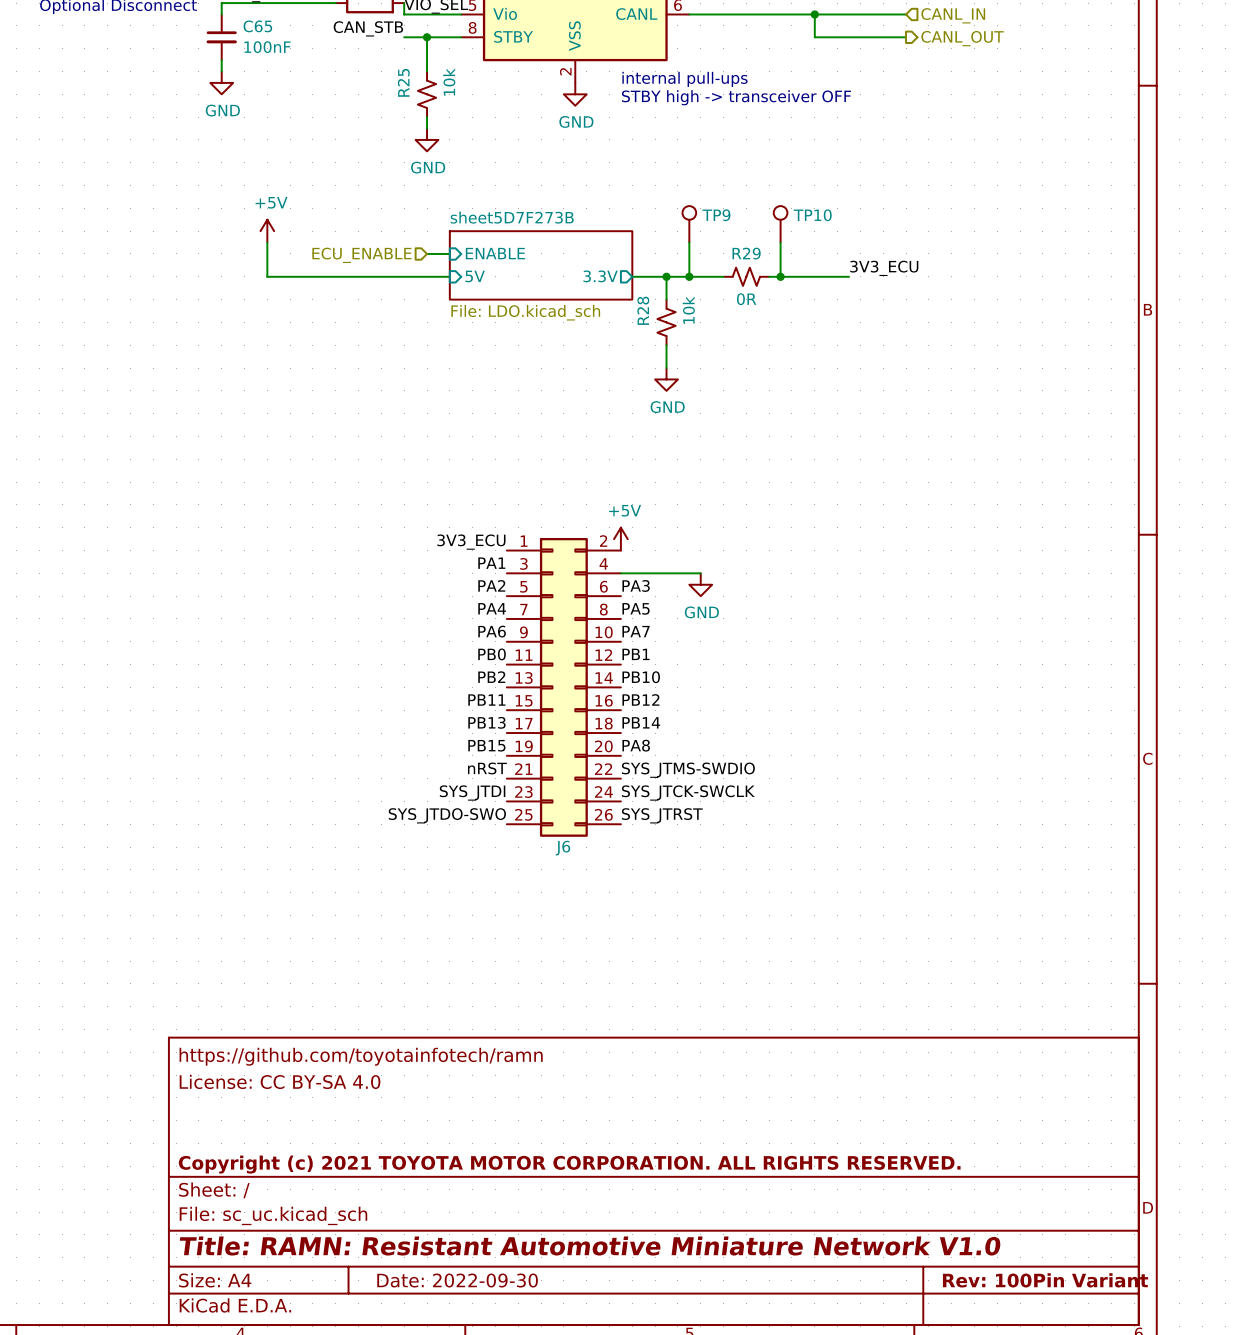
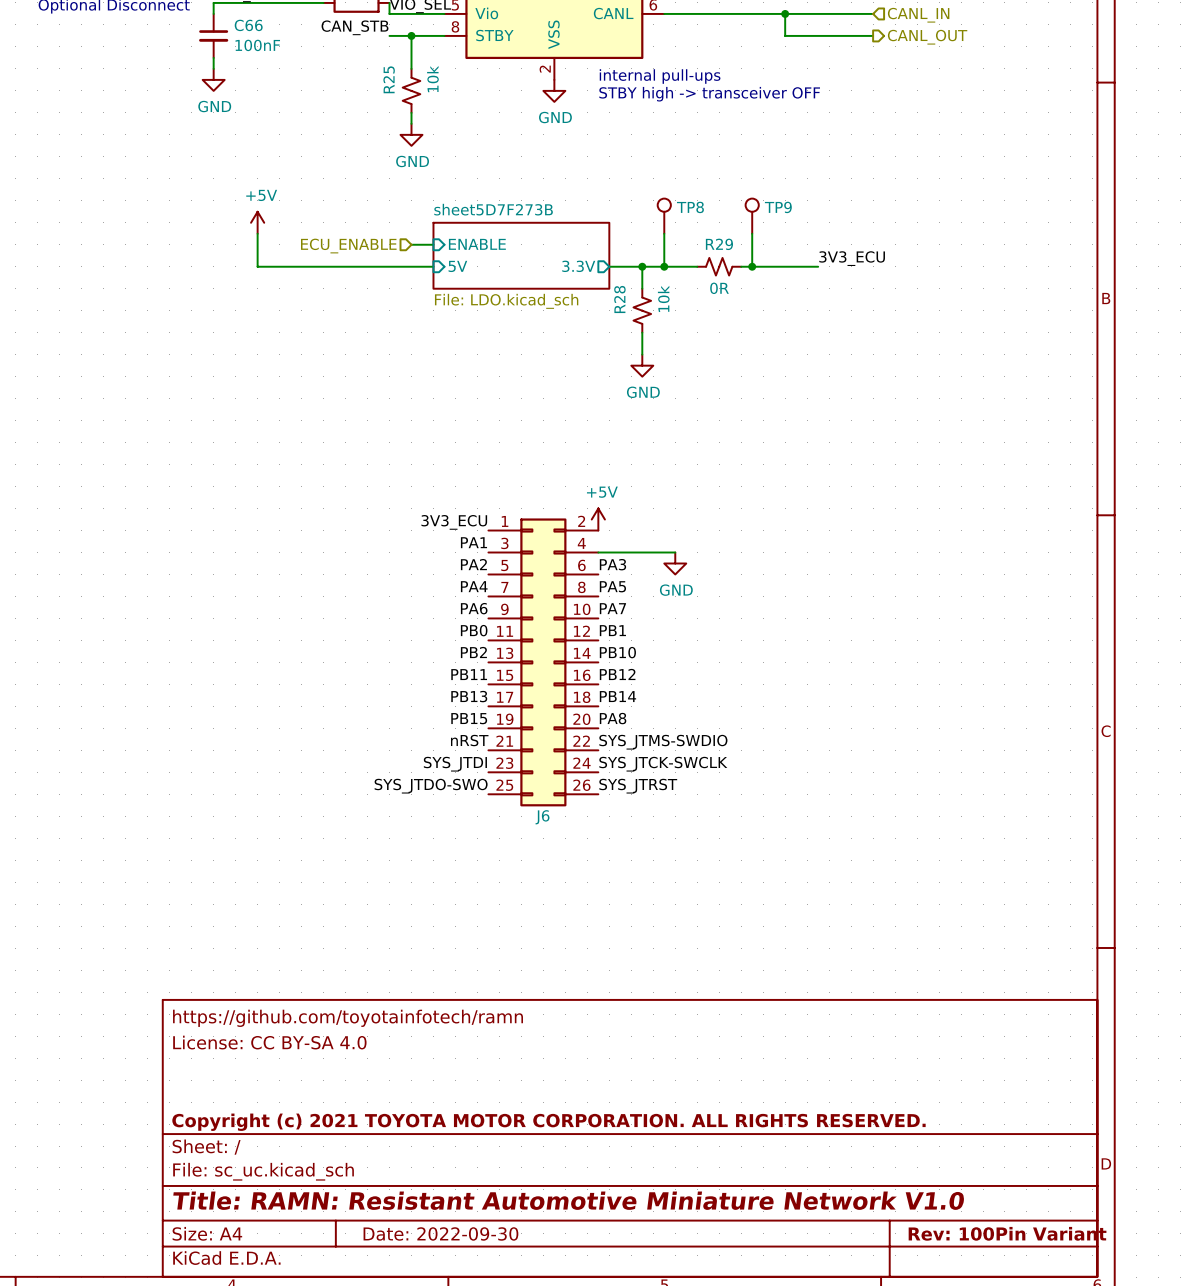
C65 name: C65 (257, 26) -> C66 (248, 25)
TP9 name: TP9 (716, 215) -> TP8 (690, 207)
TP10 name: TP10 (812, 215) -> TP9 (778, 207)

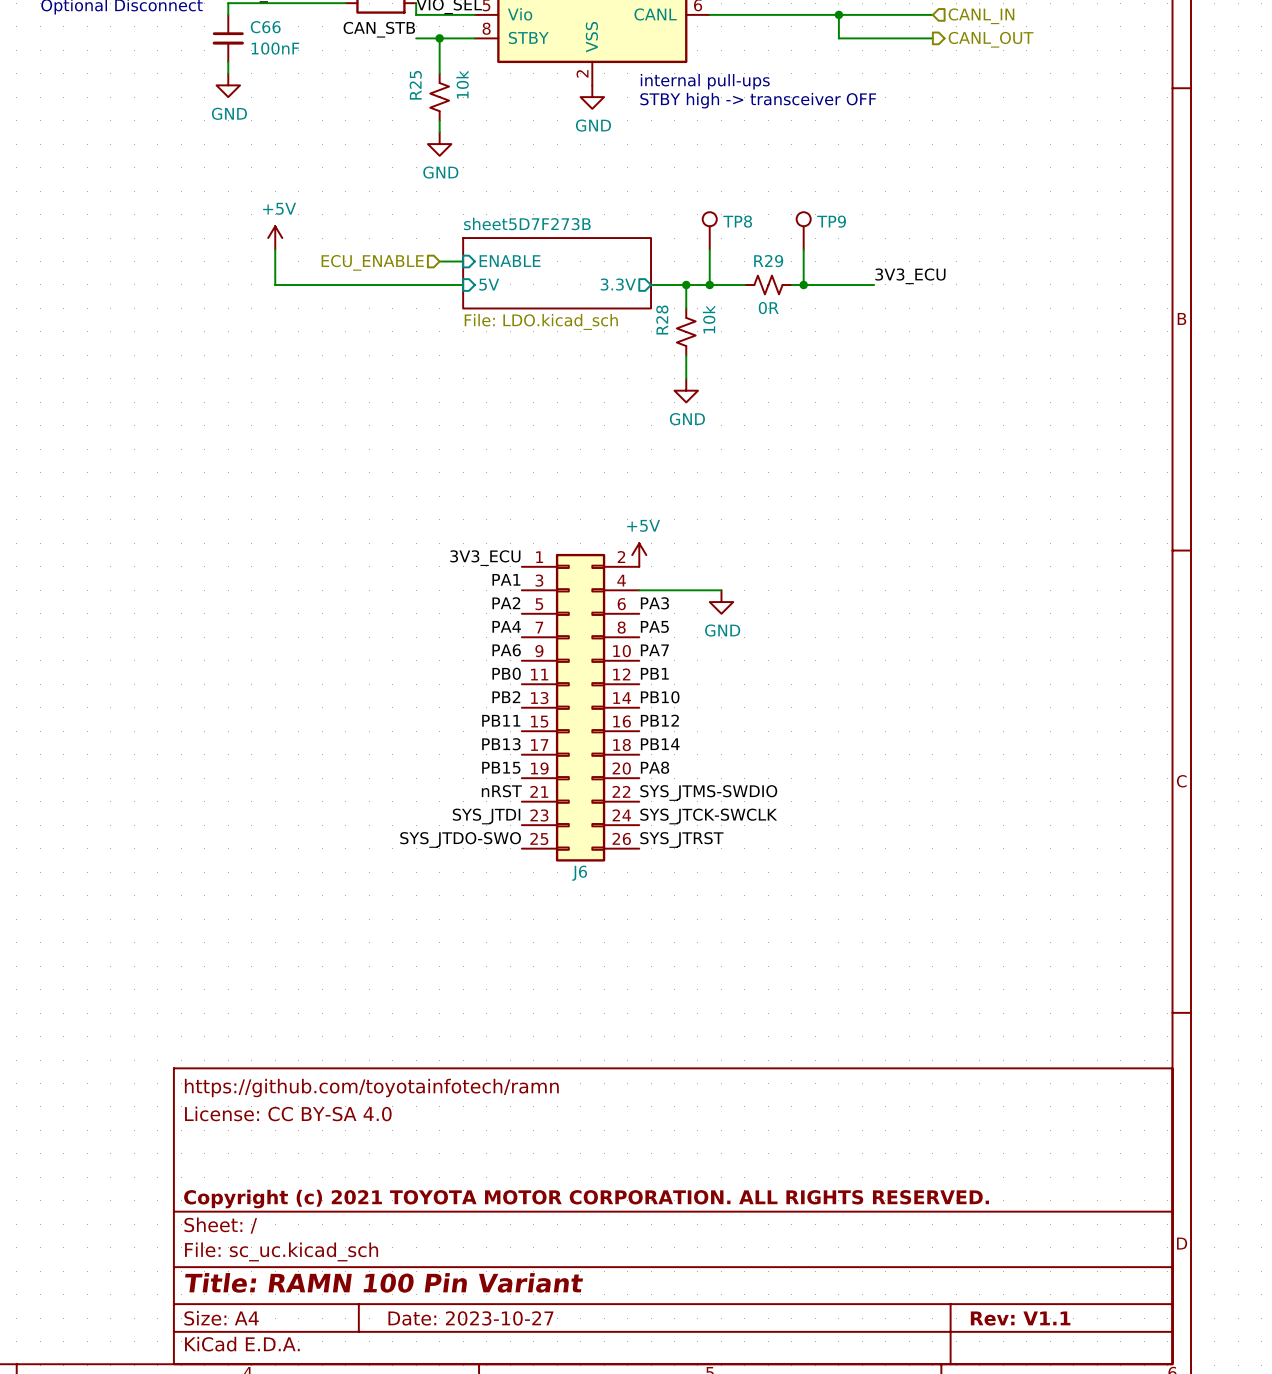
title block: Title: RAMN: Resistant Automotive Miniature Network V1.0 (568, 1200) -> Title: RAMN 100 Pin Variant (384, 1282)
title block: Date: 2022-09-30 (440, 1233) -> Date: 2023-10-27 (470, 1318)
title block: Rev: 100Pin Variant (1007, 1233) -> Rev: V1.1 (1020, 1318)

